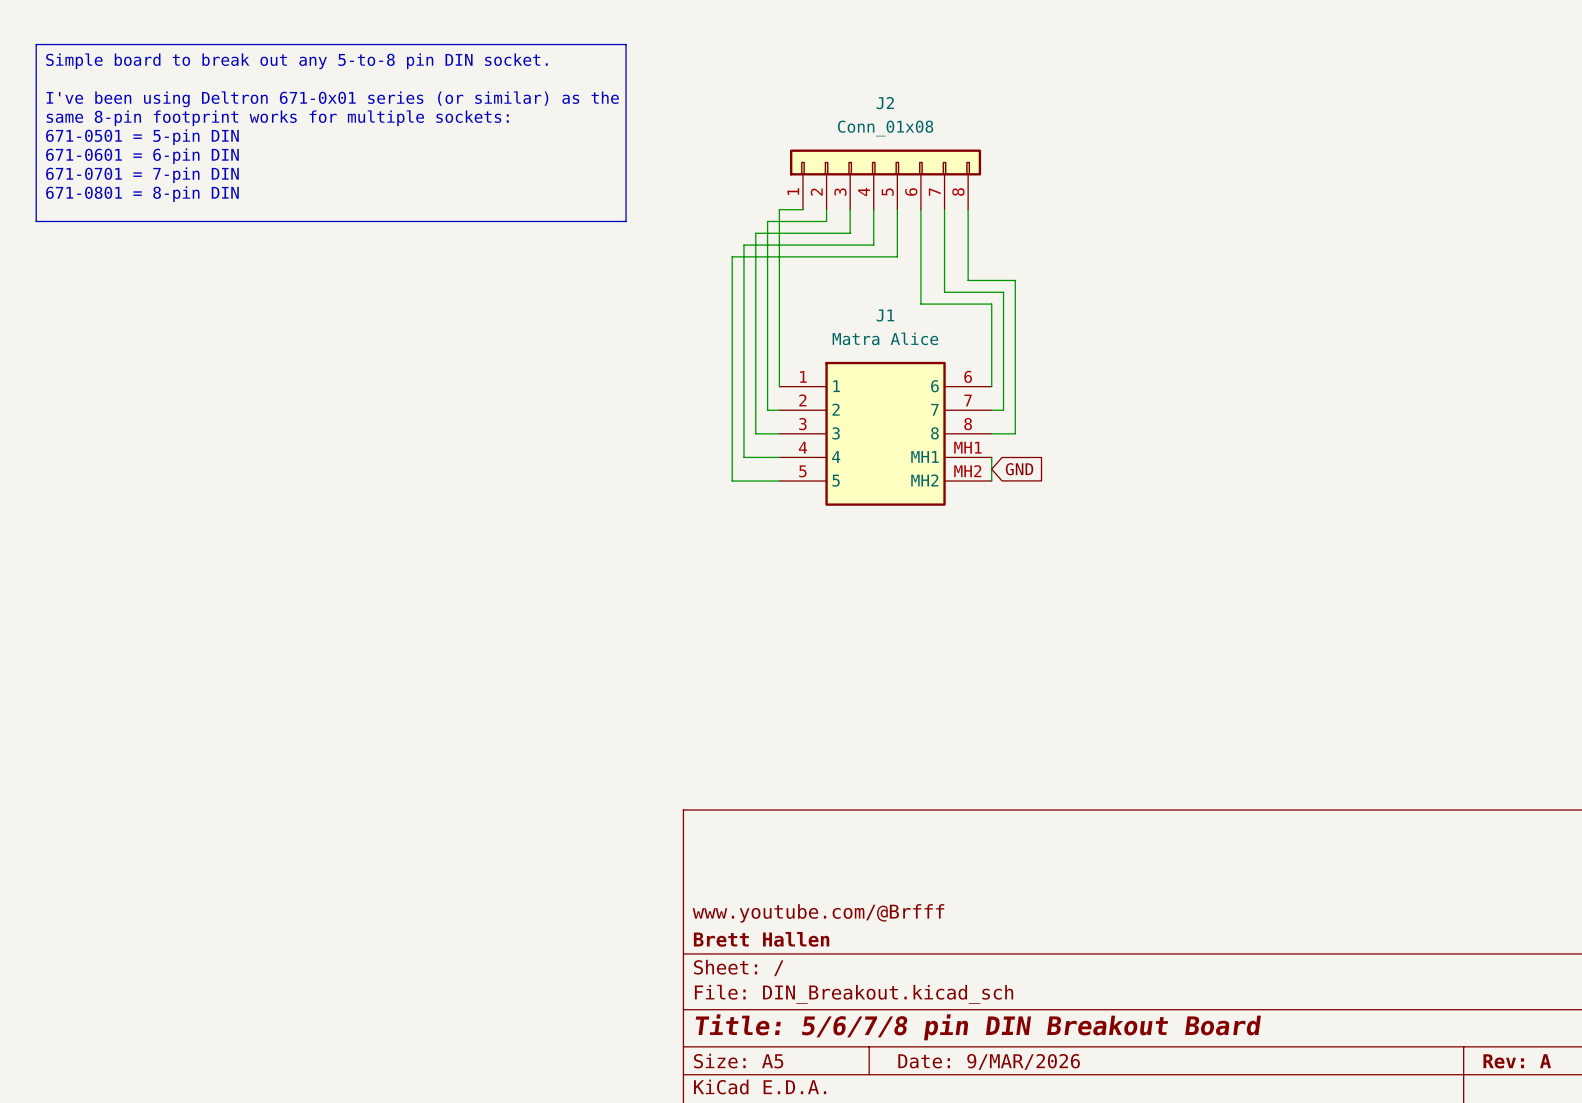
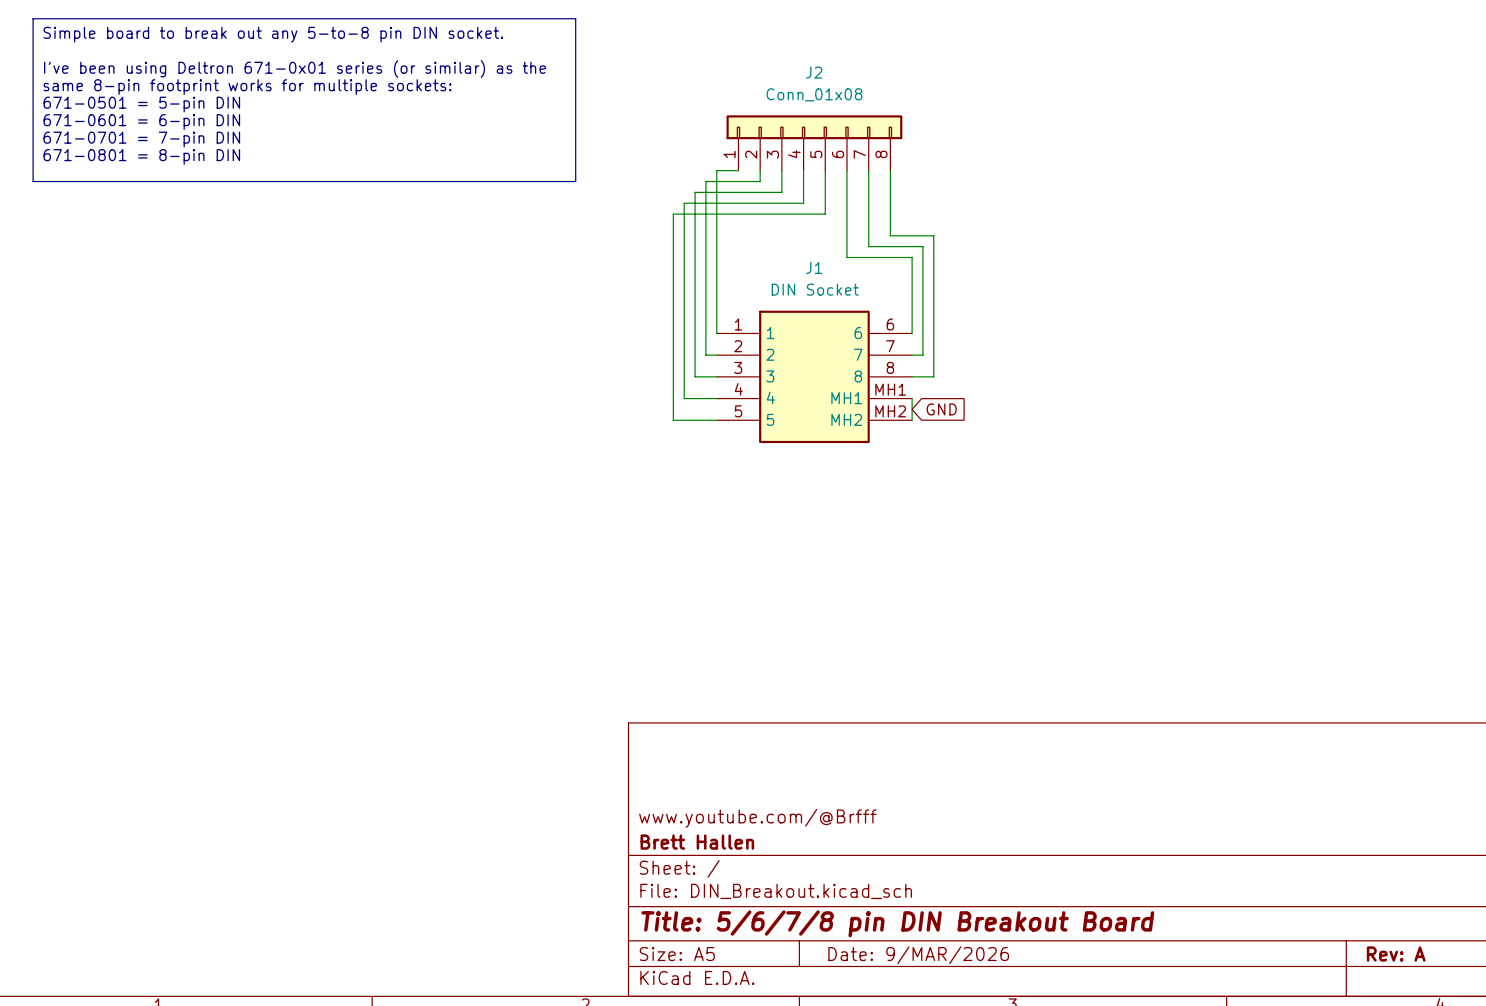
J1 value: Matra Alice (885, 338) -> DIN Socket (815, 289)

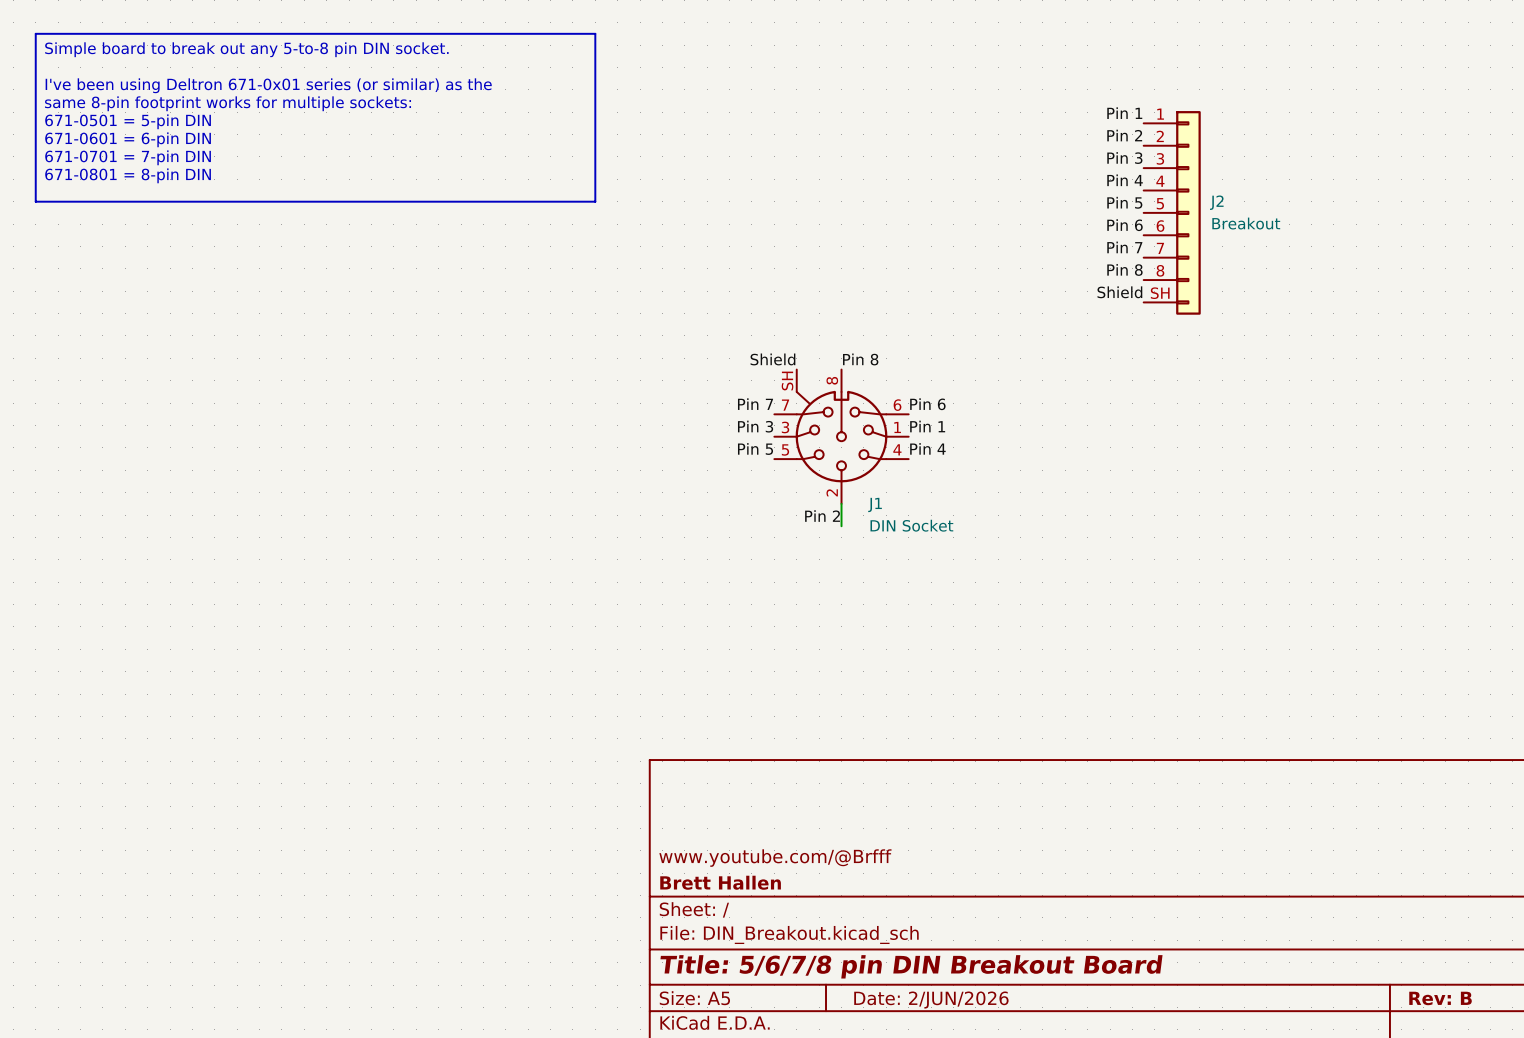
J2 name position: J2 (814, 72) -> J2 (1216, 202)
J2 value: Conn_01x08 (814, 94) -> Breakout (1246, 223)
label: none -> Pin 1 (1124, 113)
J2 symbol: [726, 115, 903, 171] -> [1143, 111, 1201, 315]
label: none -> Pin 2 (1124, 135)
label: none -> Pin 3 (1124, 158)
label: none -> Pin 4 (1125, 180)
wire: (738, 170) (716, 170) (716, 333) -> none
wire: (760, 170) (760, 181) (705, 181) (705, 355) (716, 355) -> none
wire: (781, 170) (781, 192) (695, 192) (695, 376) (716, 376) -> none
wire: (803, 170) (803, 203) (684, 203) (684, 398) (716, 398) -> none
wire: (825, 170) (825, 214) (673, 214) (673, 420) (716, 420) -> none
wire: (846, 170) (846, 257) (912, 257) (912, 333) -> none
wire: (868, 170) (868, 246) (922, 246) (922, 355) (912, 355) -> none
wire: (890, 170) (890, 235) (933, 235) (933, 376) (912, 376) -> none
label: none -> Pin 5 (1124, 202)
label: none -> Pin 6 (1125, 225)
label: none -> Pin 7 (1124, 247)
label: none -> Pin 8 (1124, 269)
J1 name position: J1 (814, 267) -> J1 (875, 504)
label: none -> Shield (1119, 292)
J1 value position: DIN Socket (815, 289) -> DIN Socket (911, 525)
J1 symbol: [716, 310, 913, 444] -> [774, 369, 909, 504]
label: none -> Shield (772, 359)
label: none -> Pin 8 (860, 359)
label: none -> Pin 7 (755, 404)
label: none -> Pin 6 (927, 404)
wire: (912, 398) (912, 420) -> (841, 503) (841, 526)
label: none -> Pin 3 (755, 426)
label: none -> Pin 1 (927, 426)
global label: GND (941, 409) -> none
label: none -> Pin 5 (755, 448)
label: none -> Pin 4 (927, 448)
label: none -> Pin 2 (822, 516)
title block: Rev: A (1396, 954) -> Rev: B (1440, 998)
title block: Date: 9/MAR/2026 (918, 955) -> Date: 2/JUN/2026 (931, 1000)

